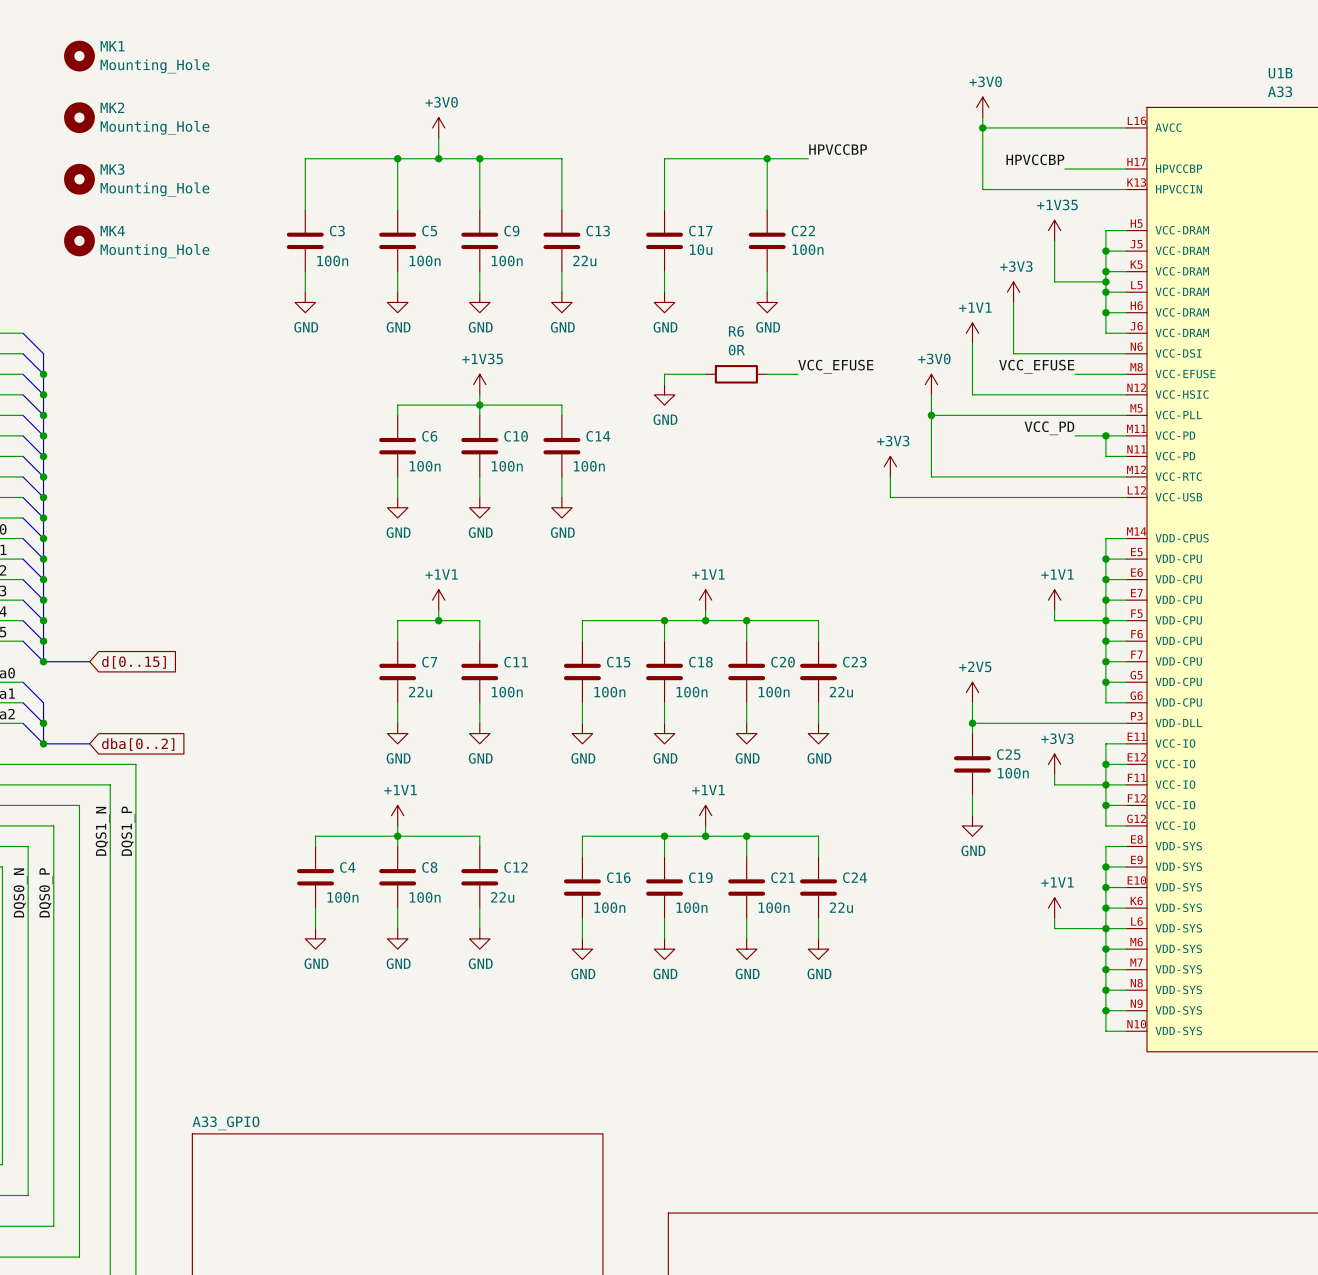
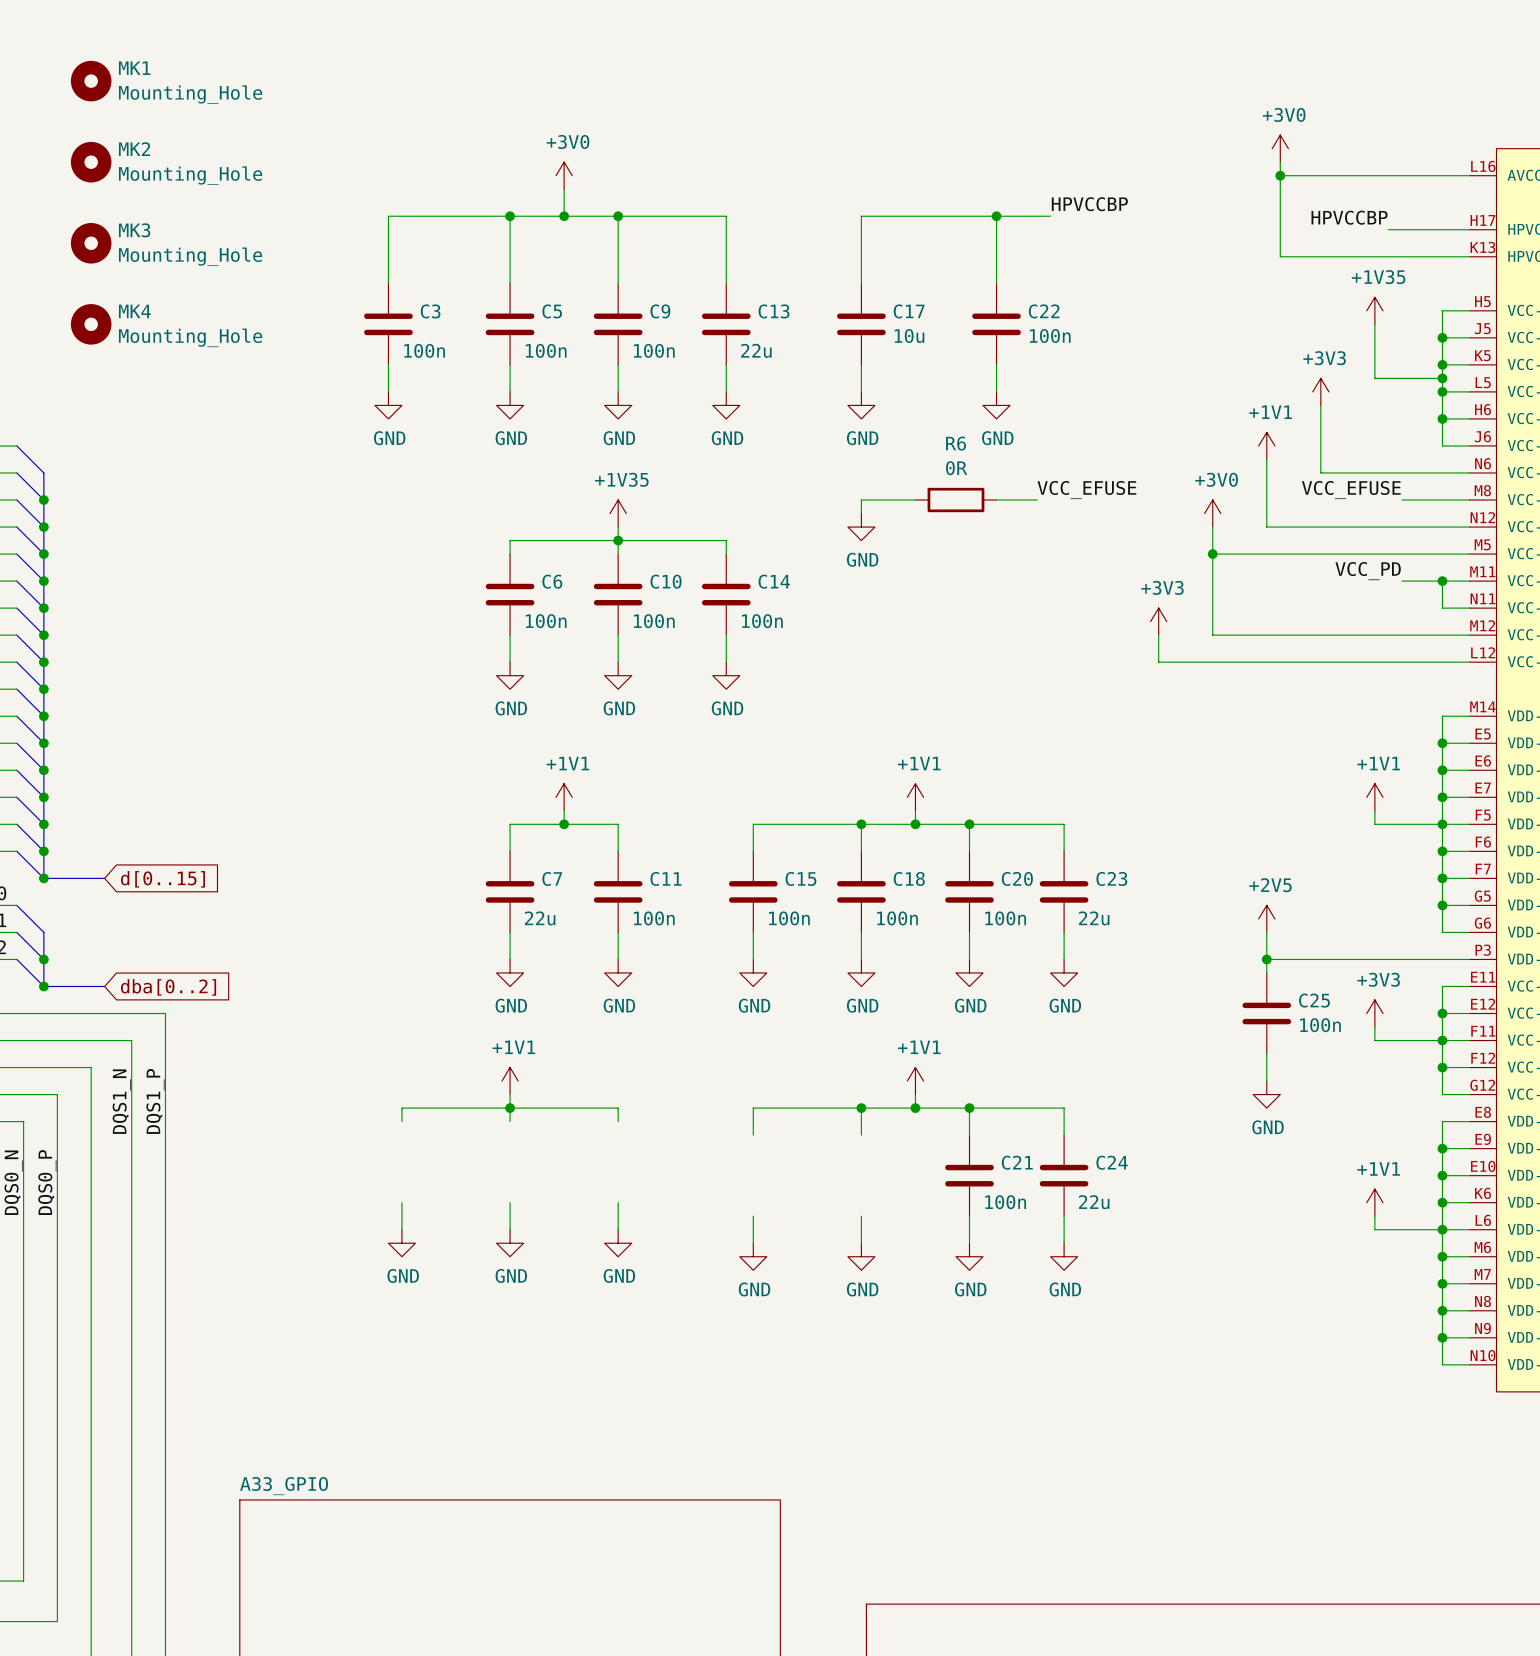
C4: 100n (315, 877) -> none
C8: 100n (397, 877) -> none
C12: 22u (479, 877) -> none
C16: 100n (582, 887) -> none
C19: 100n (664, 887) -> none

